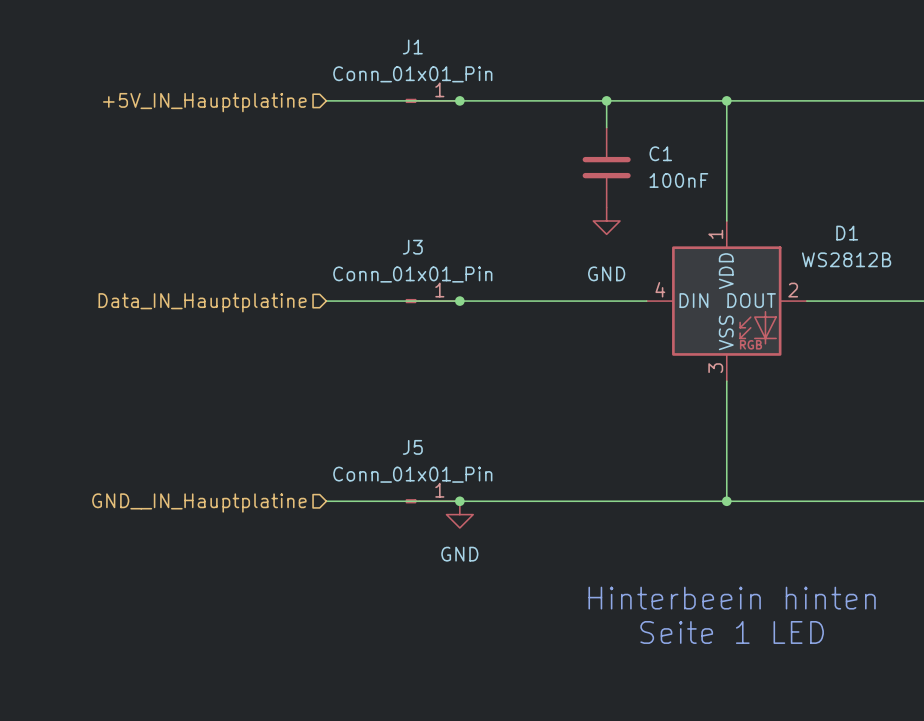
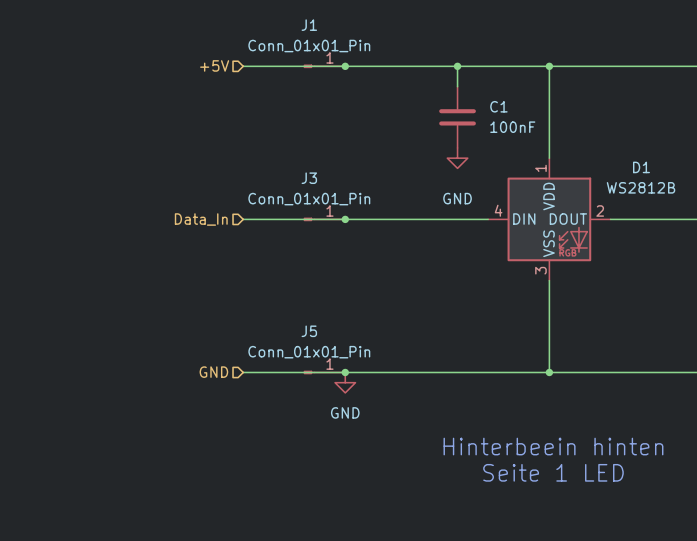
hierarchical label: +5V_IN_Hauptplatine (204, 102) -> +5V (214, 65)
hierarchical label: Data_IN_Hauptplatine (202, 302) -> Data_In (201, 219)
hierarchical label: GND__IN_Hauptplatine (199, 502) -> GND (213, 372)

